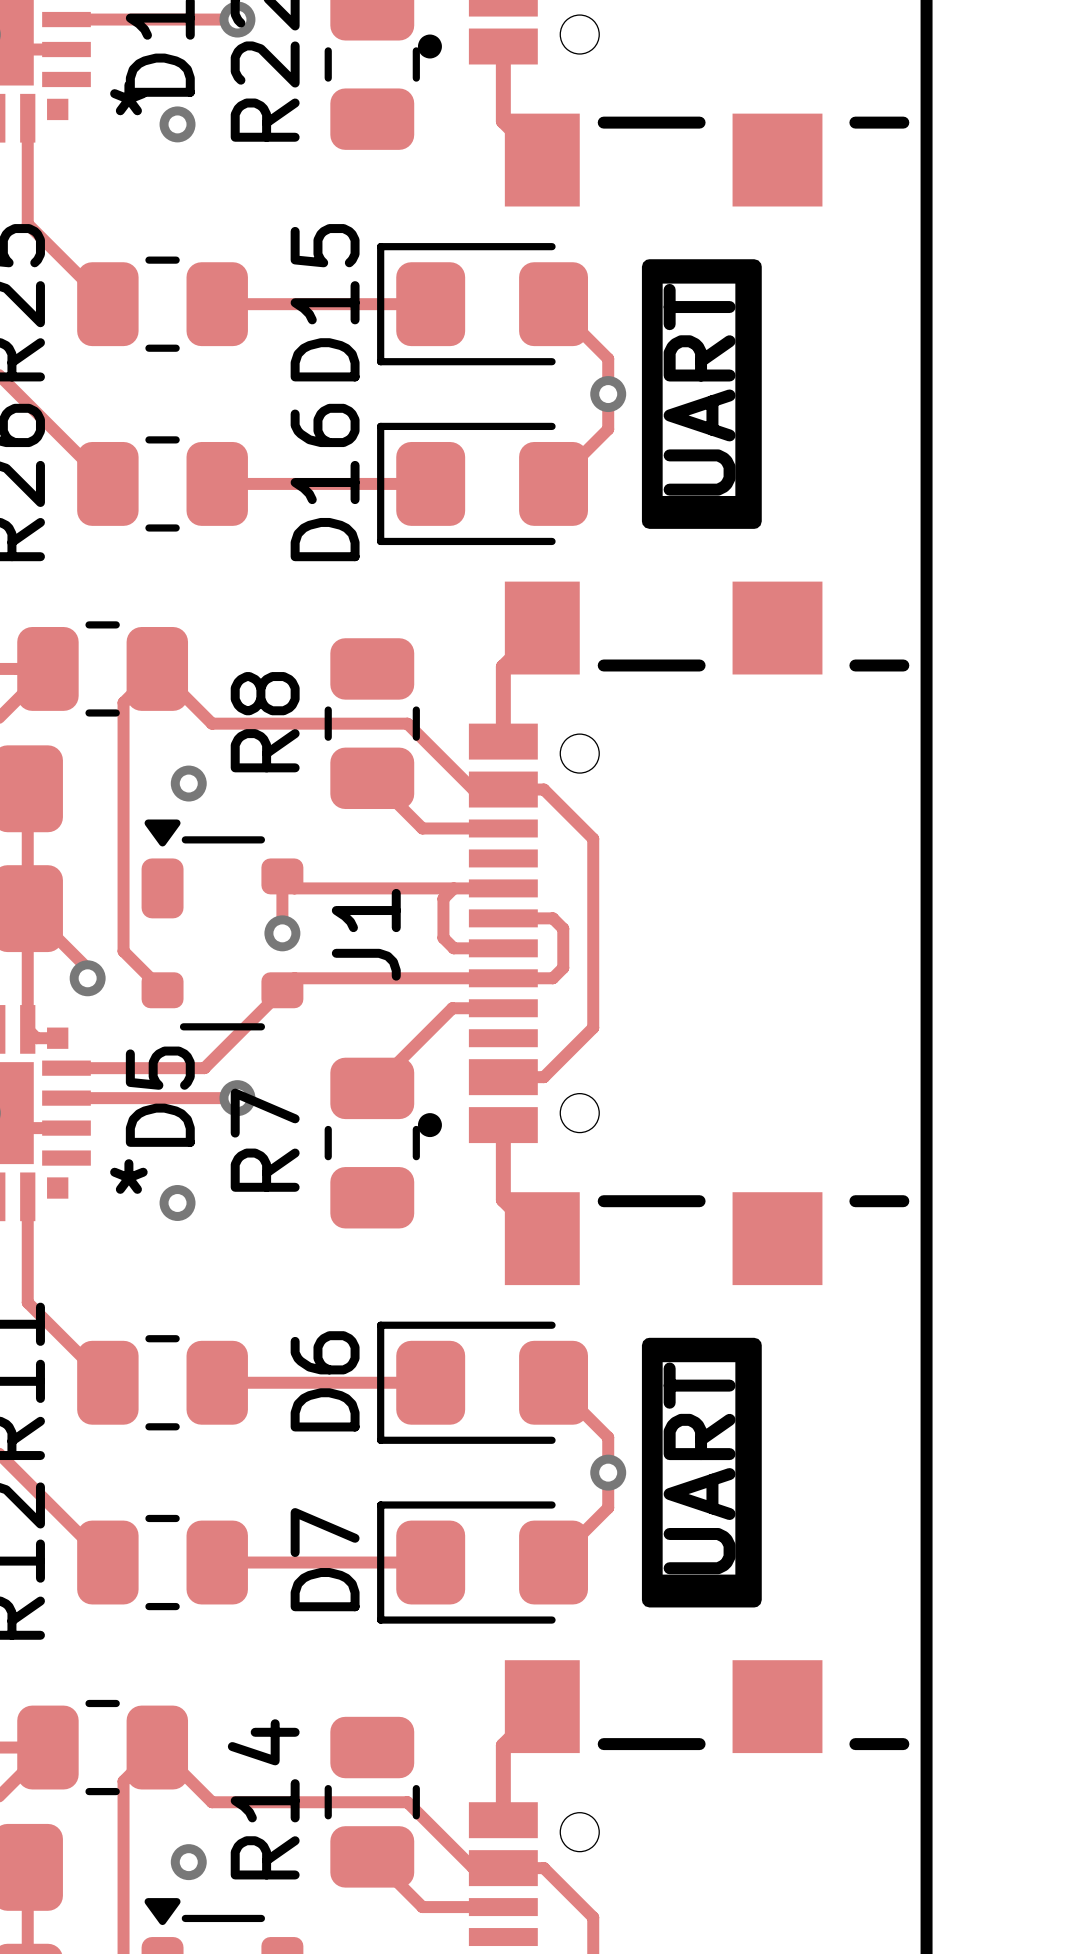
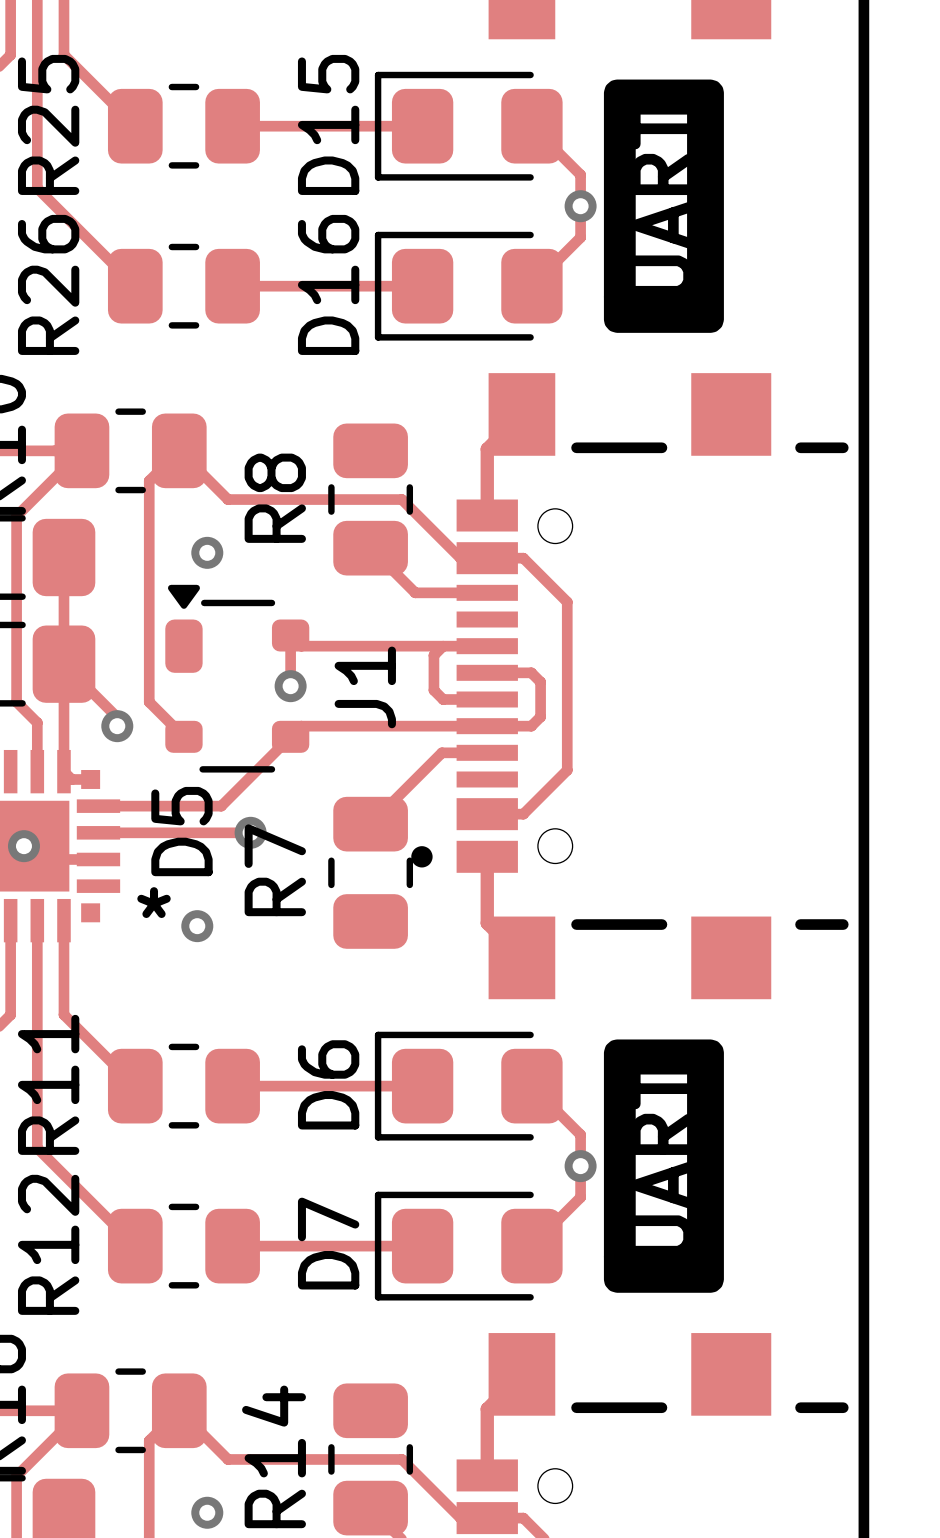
drawing shape: [641, 259, 762, 529] -> [603, 79, 724, 333]
drawing shape: [641, 1337, 762, 1608] -> [603, 1039, 724, 1293]

